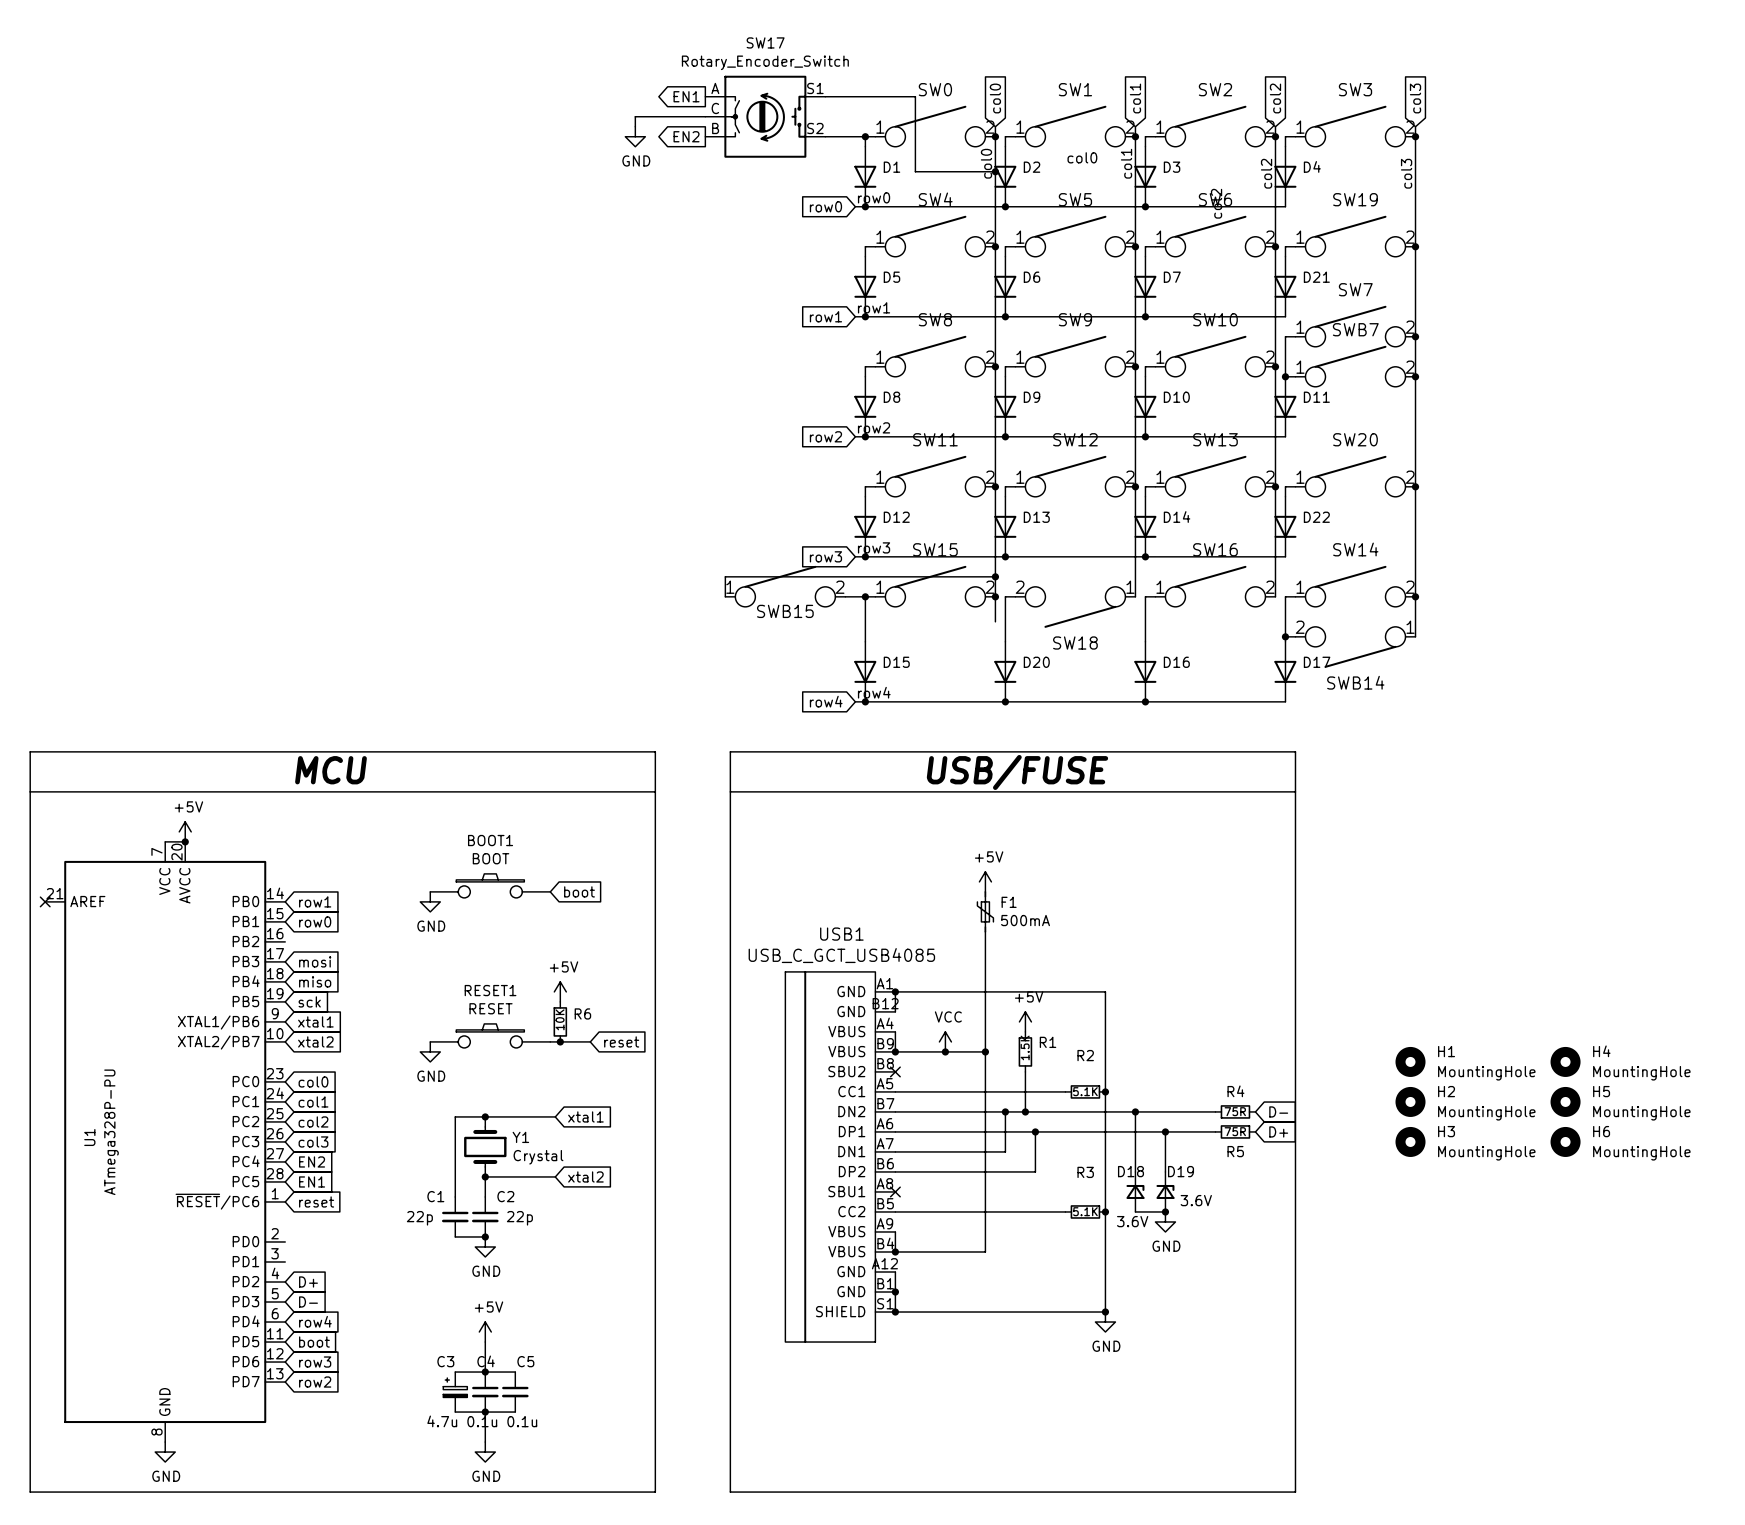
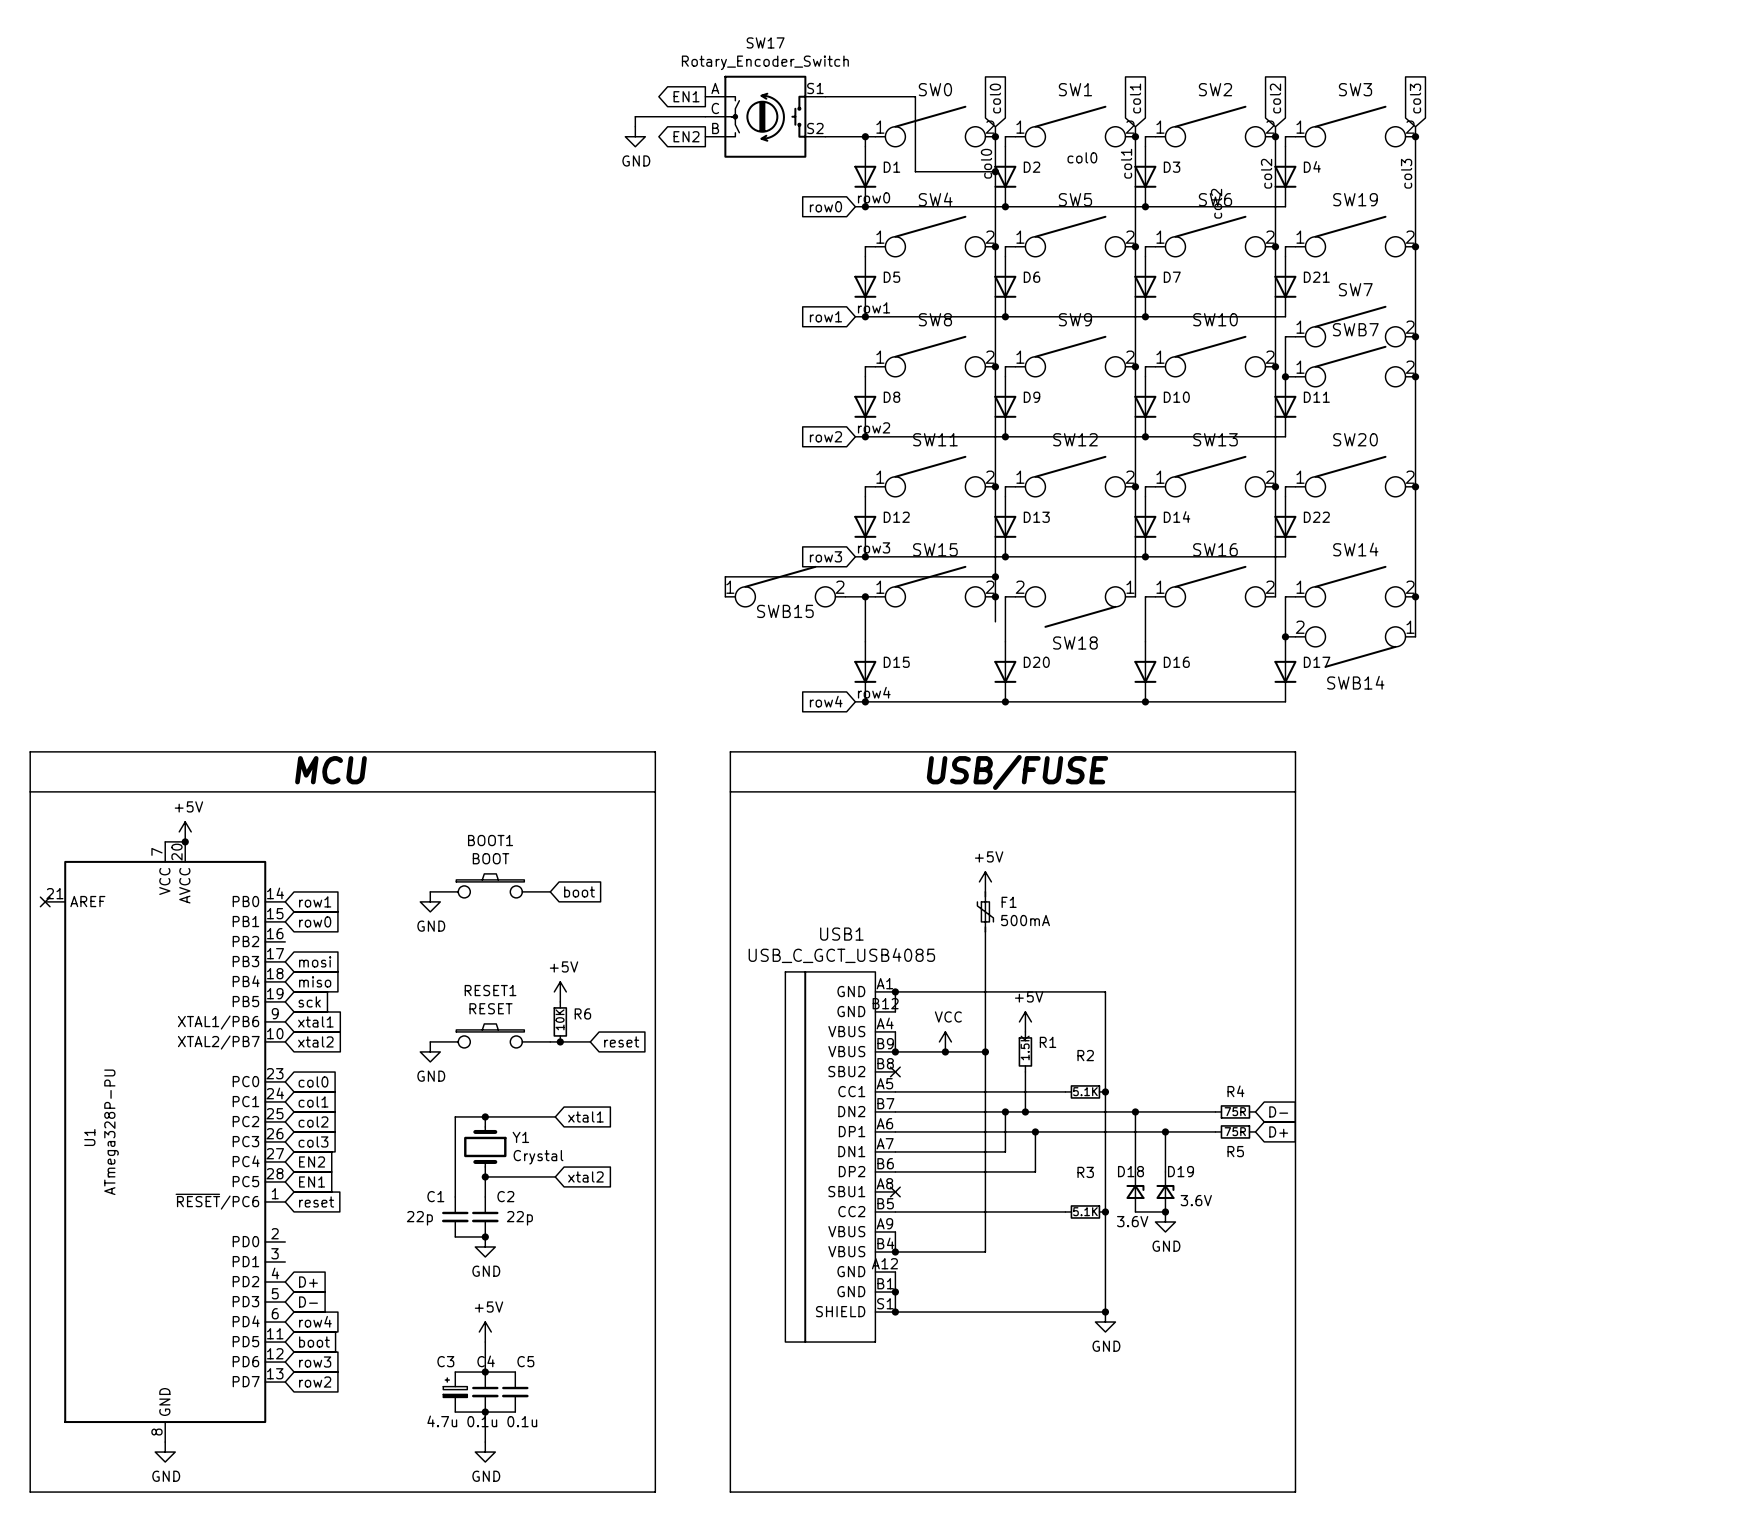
H1: MountingHole (1410, 1061) -> none
H4: MountingHole (1565, 1061) -> none
H2: MountingHole (1410, 1101) -> none
H5: MountingHole (1565, 1101) -> none
H3: MountingHole (1410, 1141) -> none
H6: MountingHole (1565, 1141) -> none

